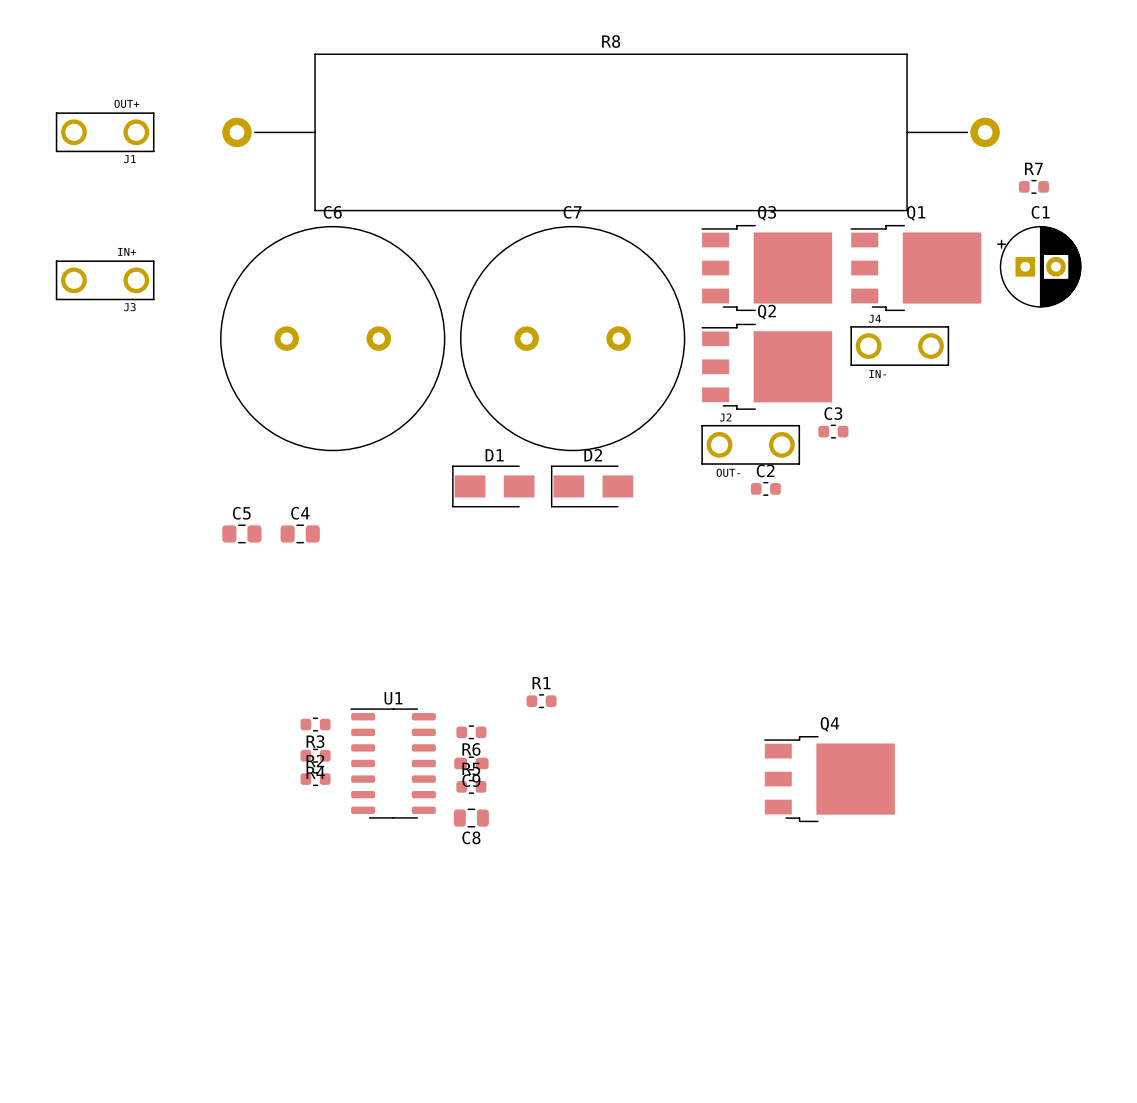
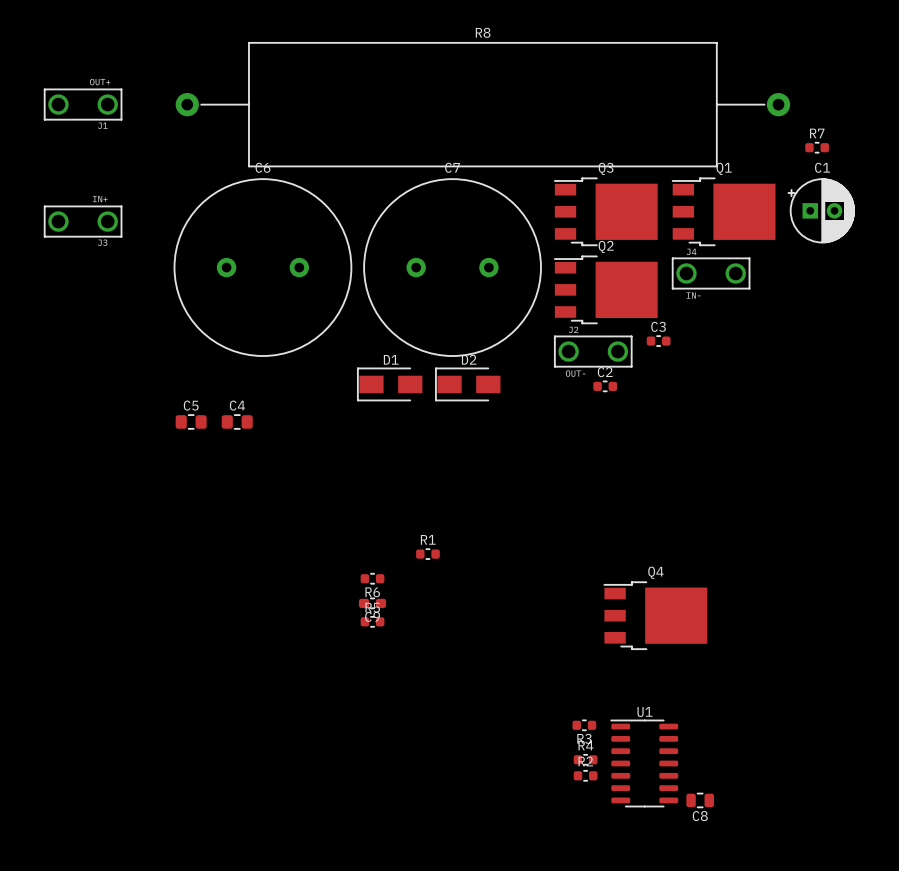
R3 position: (315, 724) -> (584, 725)
R4 position: (315, 755) -> (585, 759)
U1 position: (393, 763) -> (644, 763)
R4 name position: R4 (315, 772) -> R4 (585, 745)
R2 position: (315, 779) -> (585, 775)
C8 position: (471, 818) -> (700, 800)

